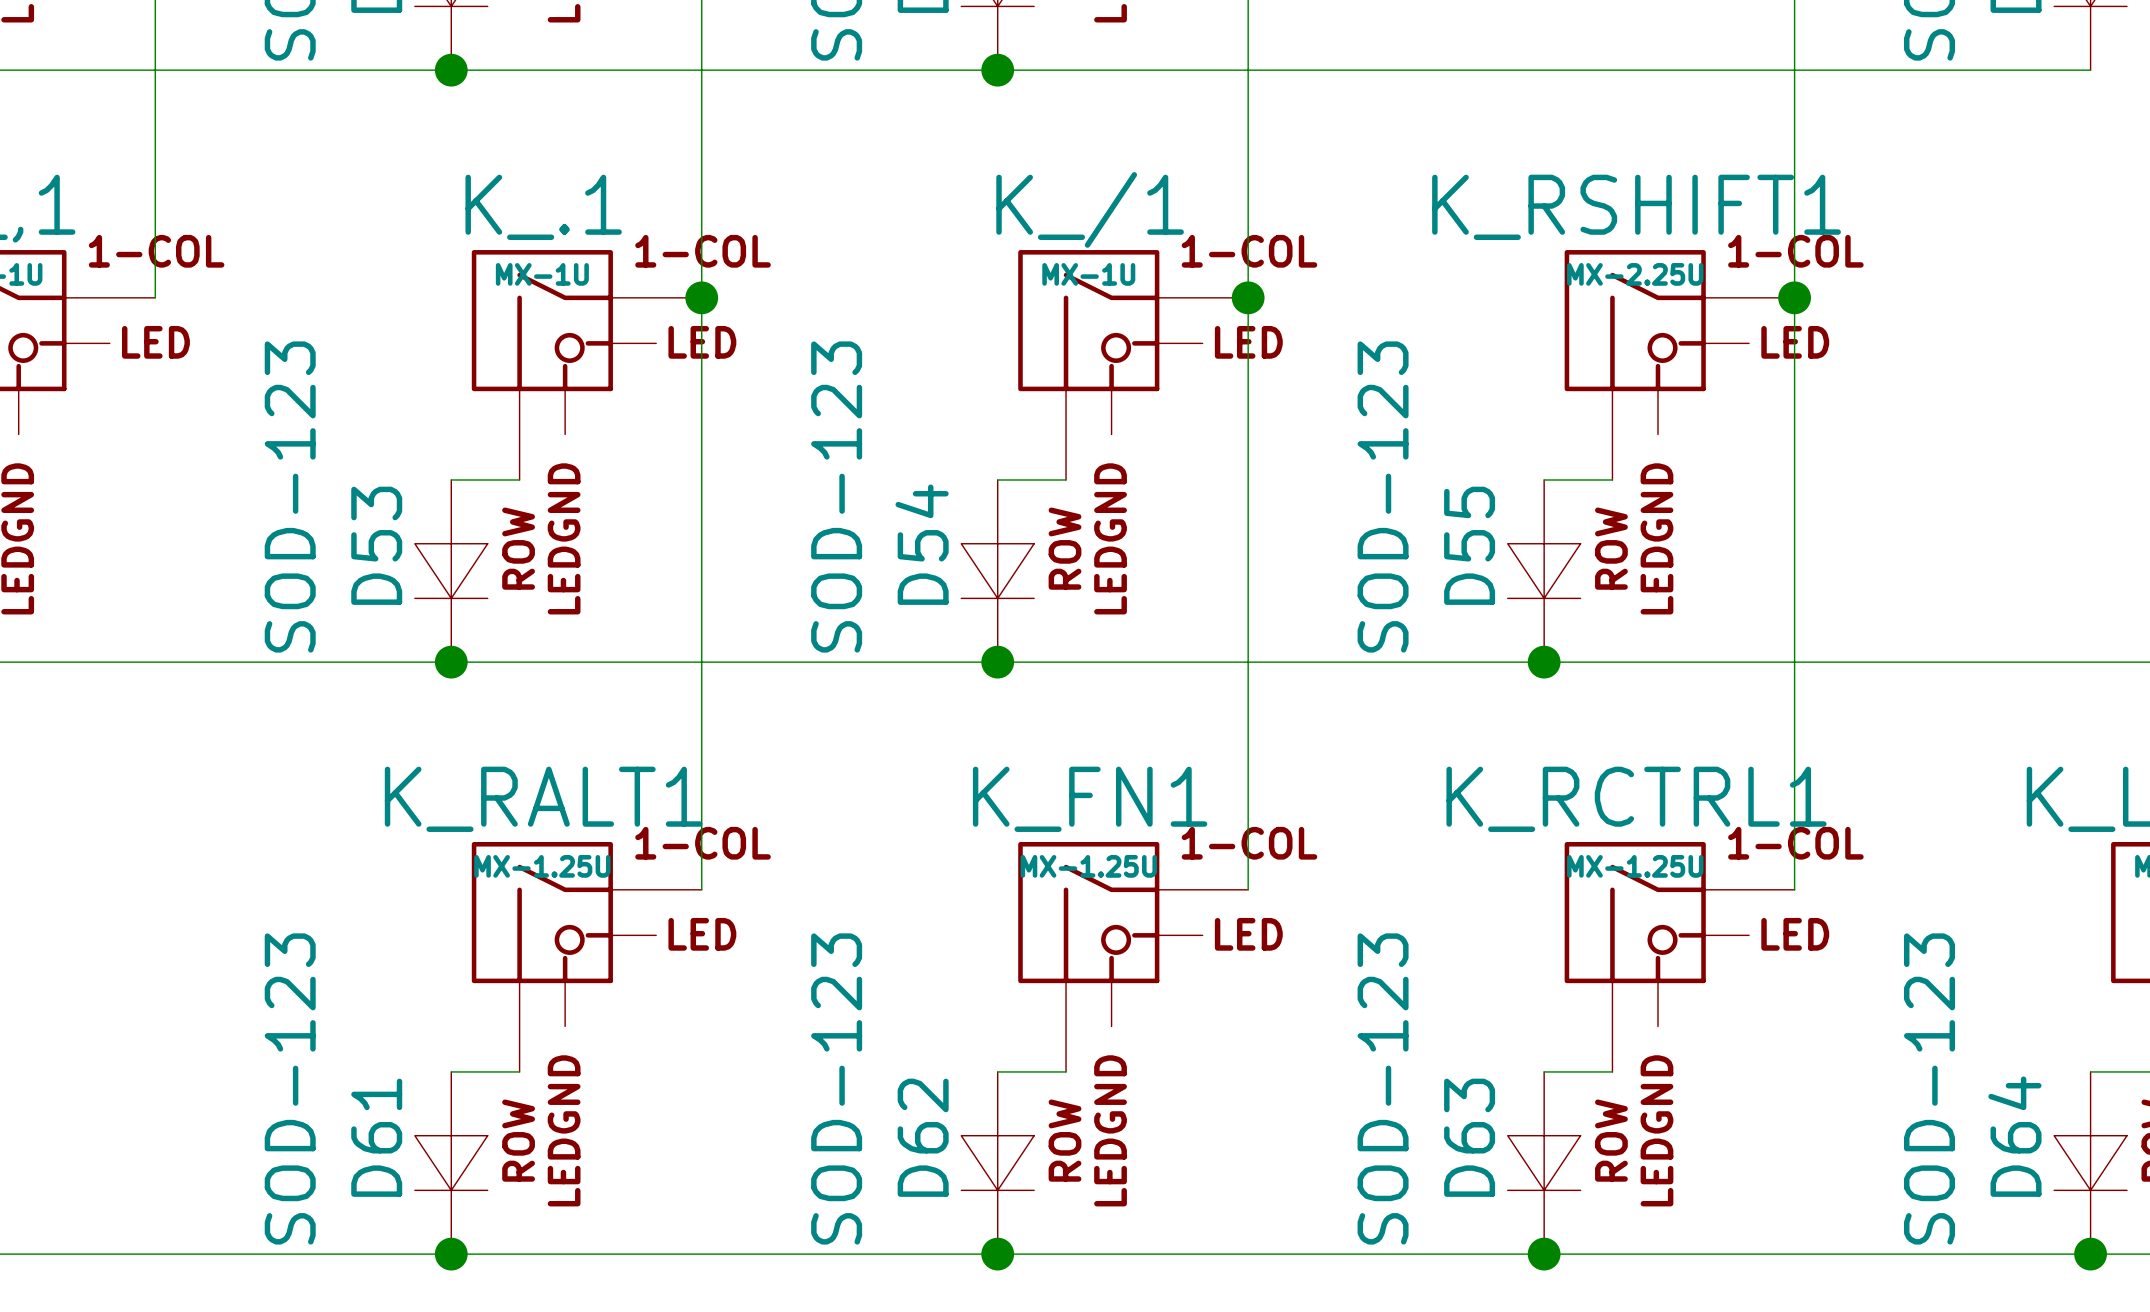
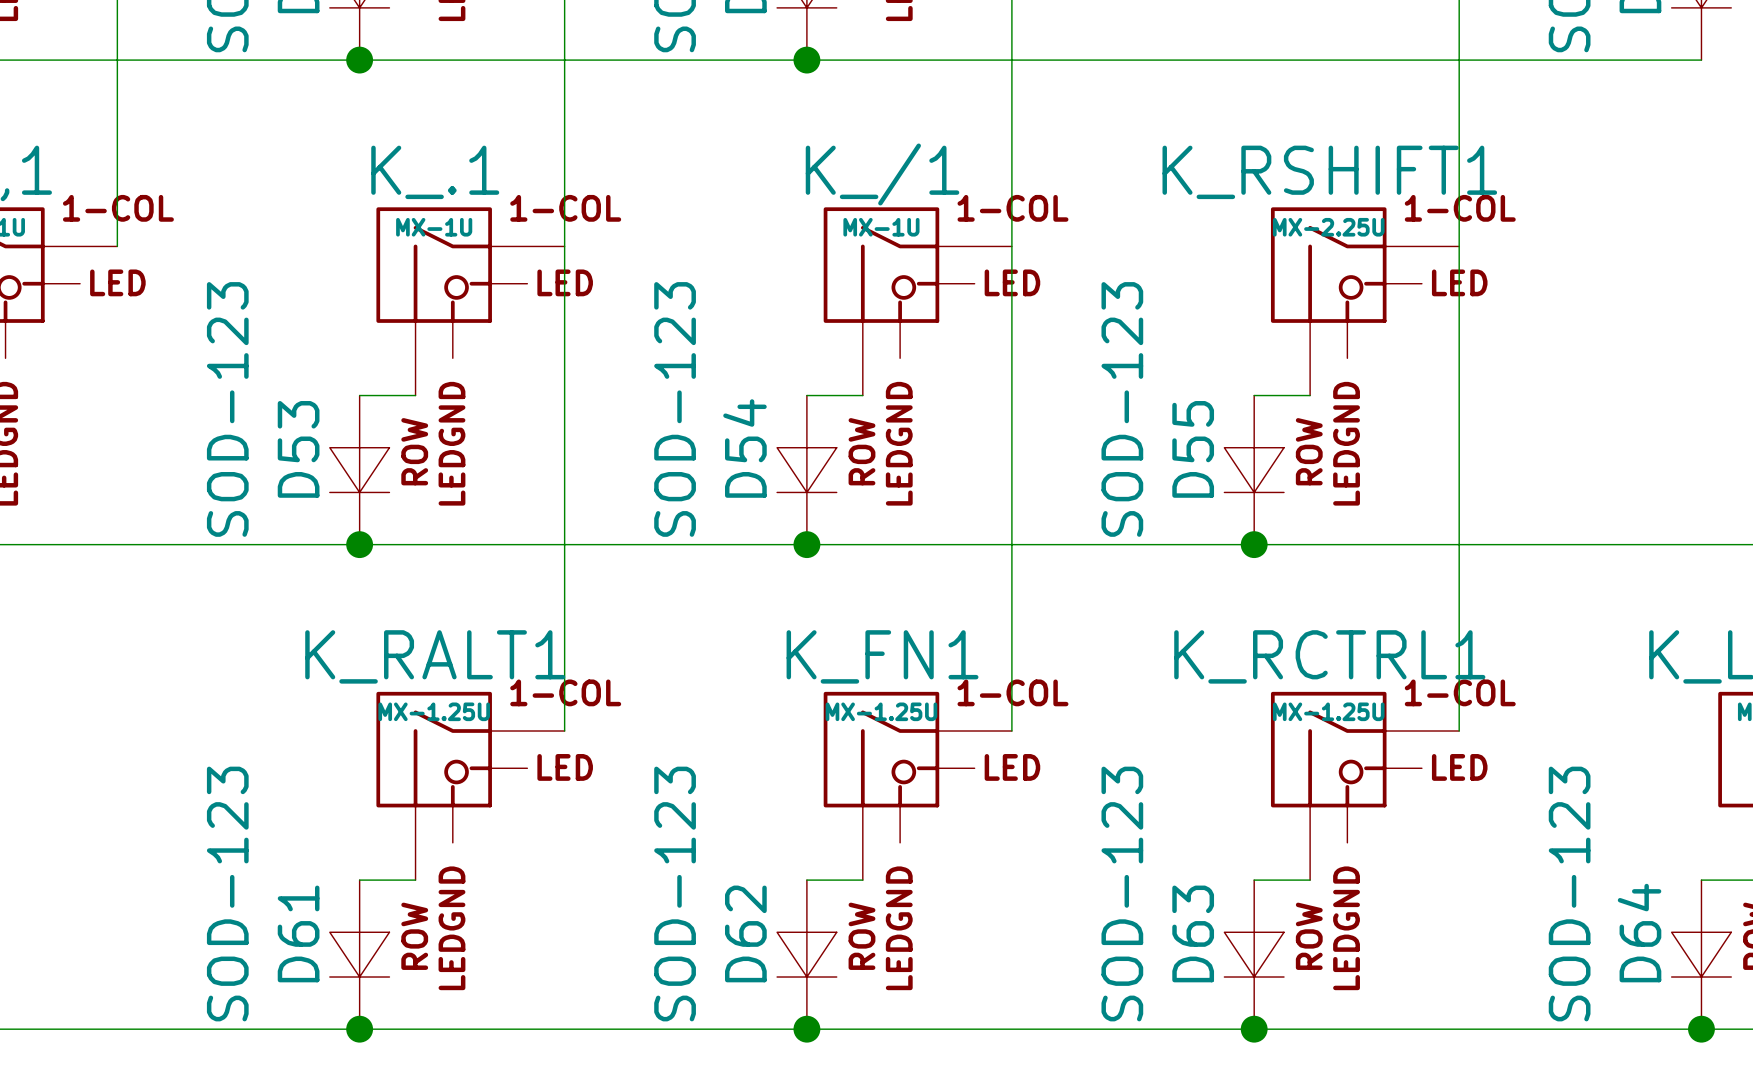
junction: (701, 297) -> none
junction: (1248, 297) -> none
junction: (1794, 297) -> none

